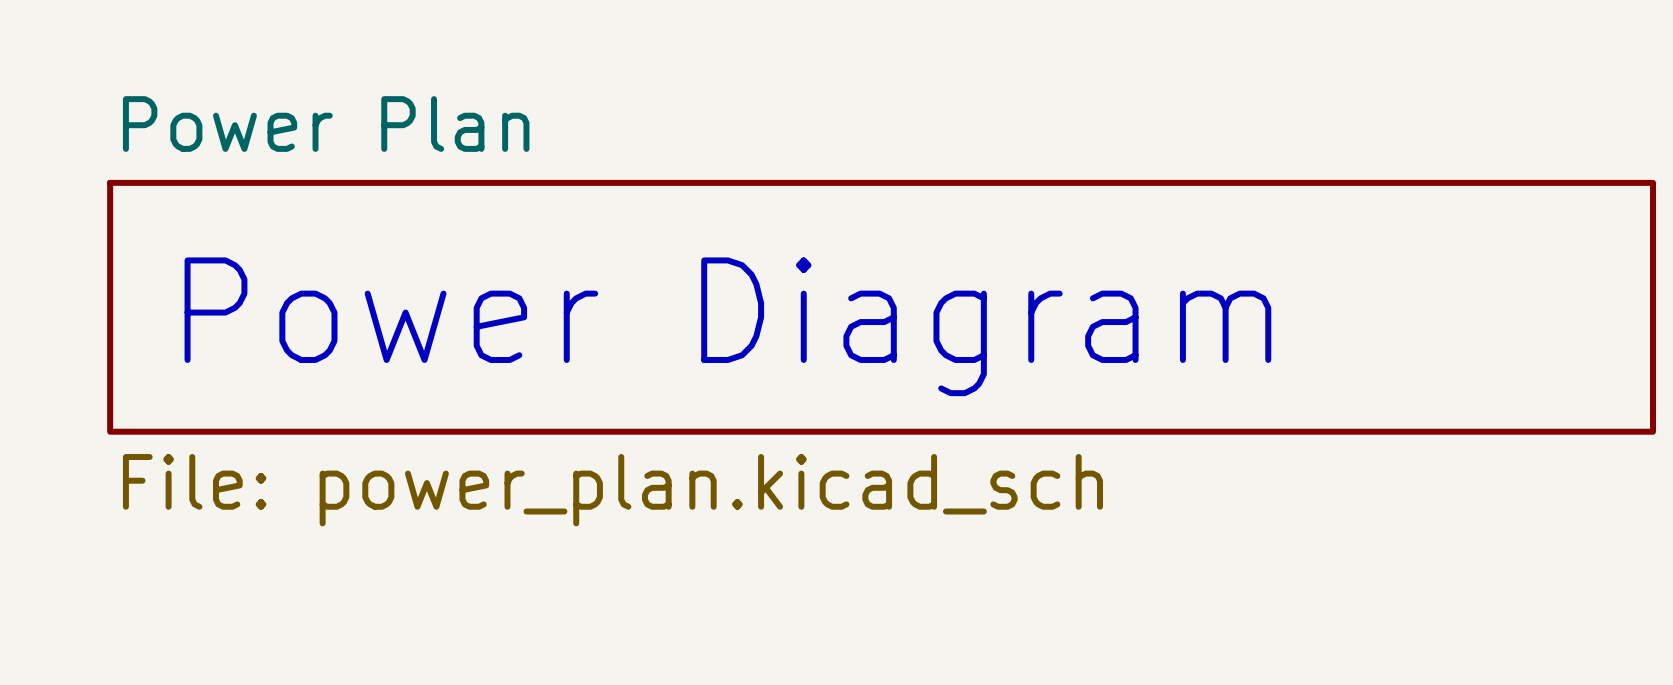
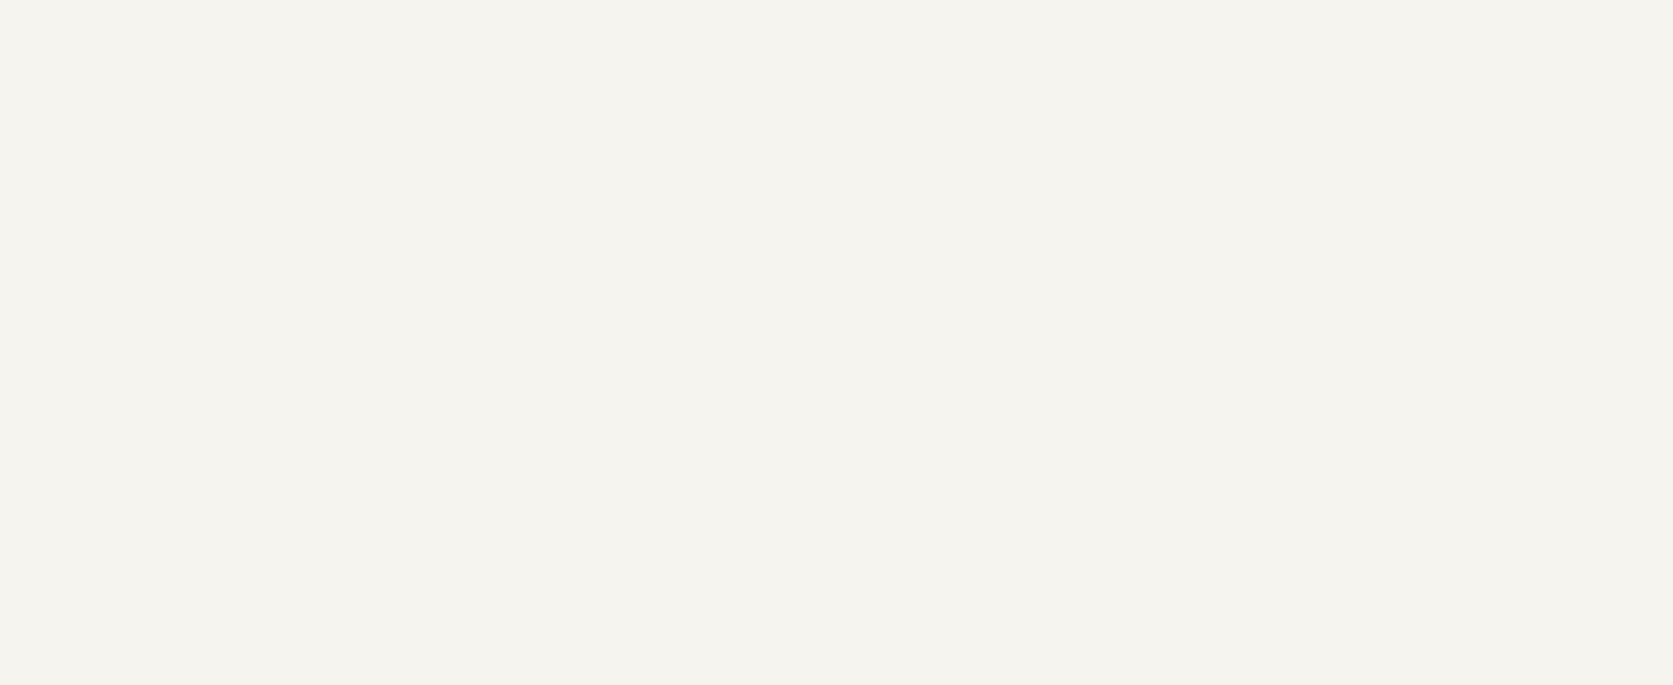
sheet Power Plan: File: power_plan.kicad_sch (881, 307) -> none
text: Power Diagram (727, 326) -> none

